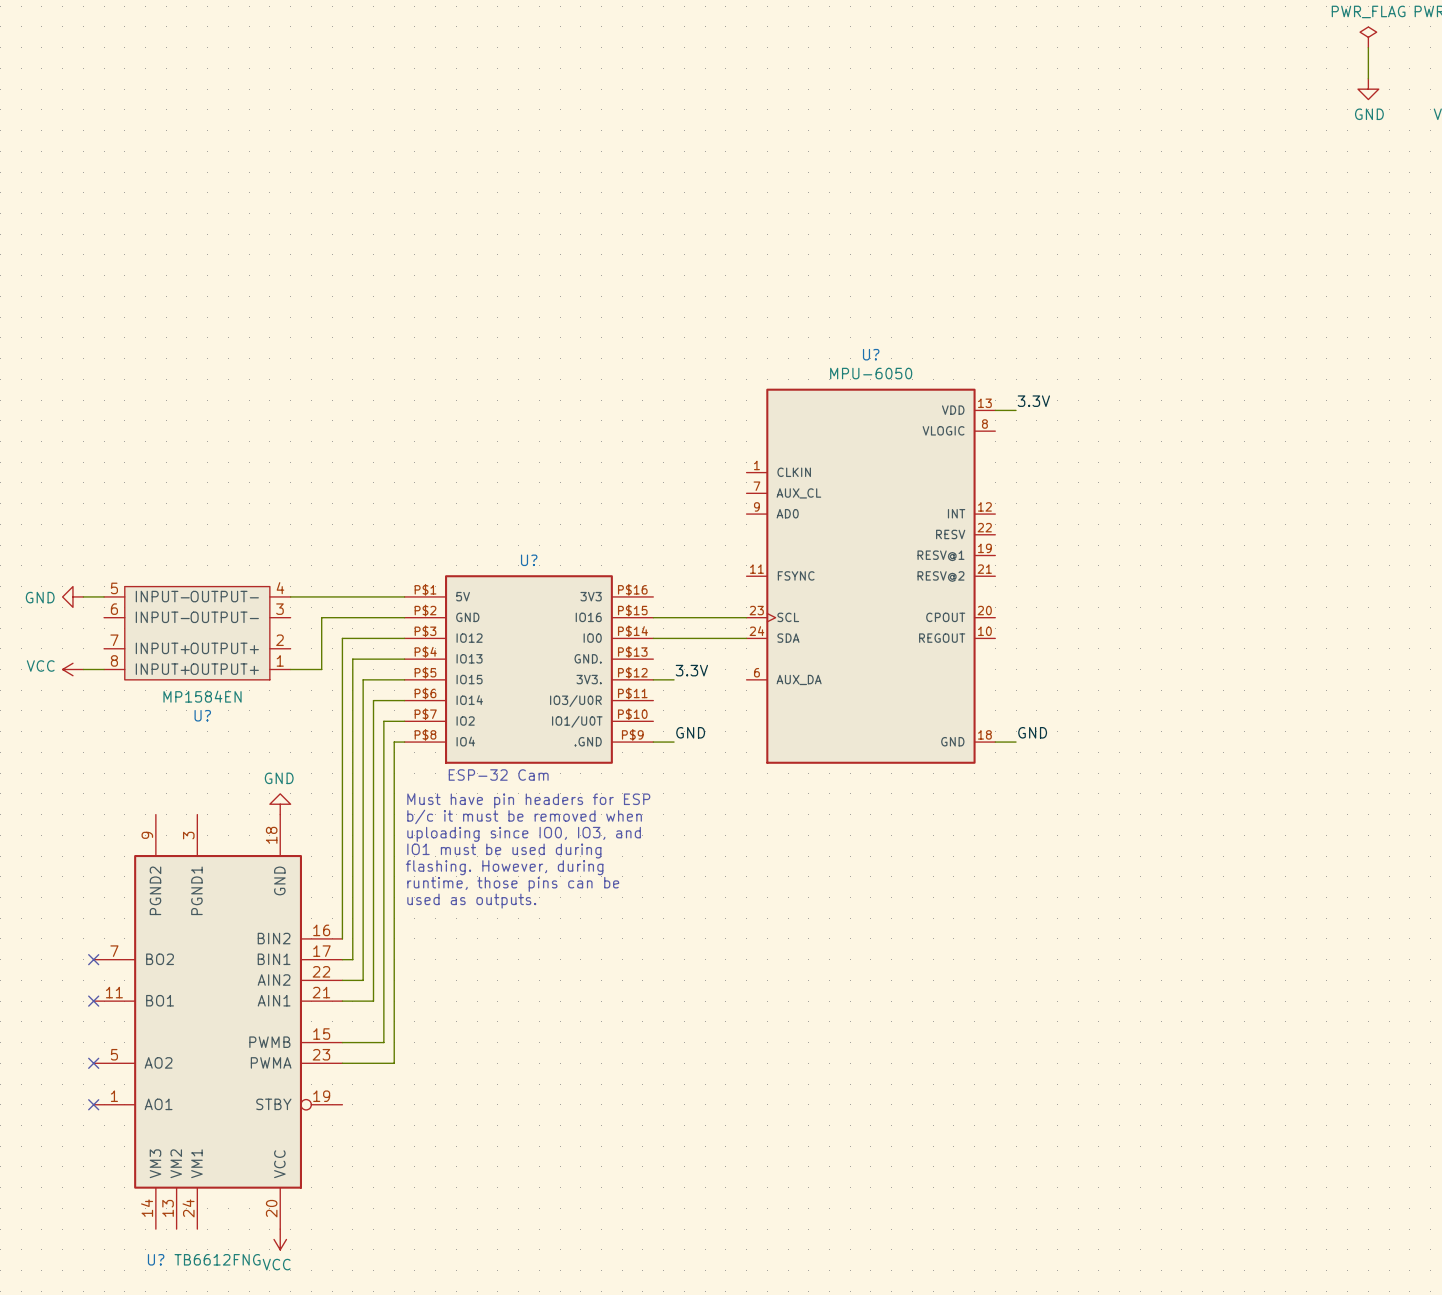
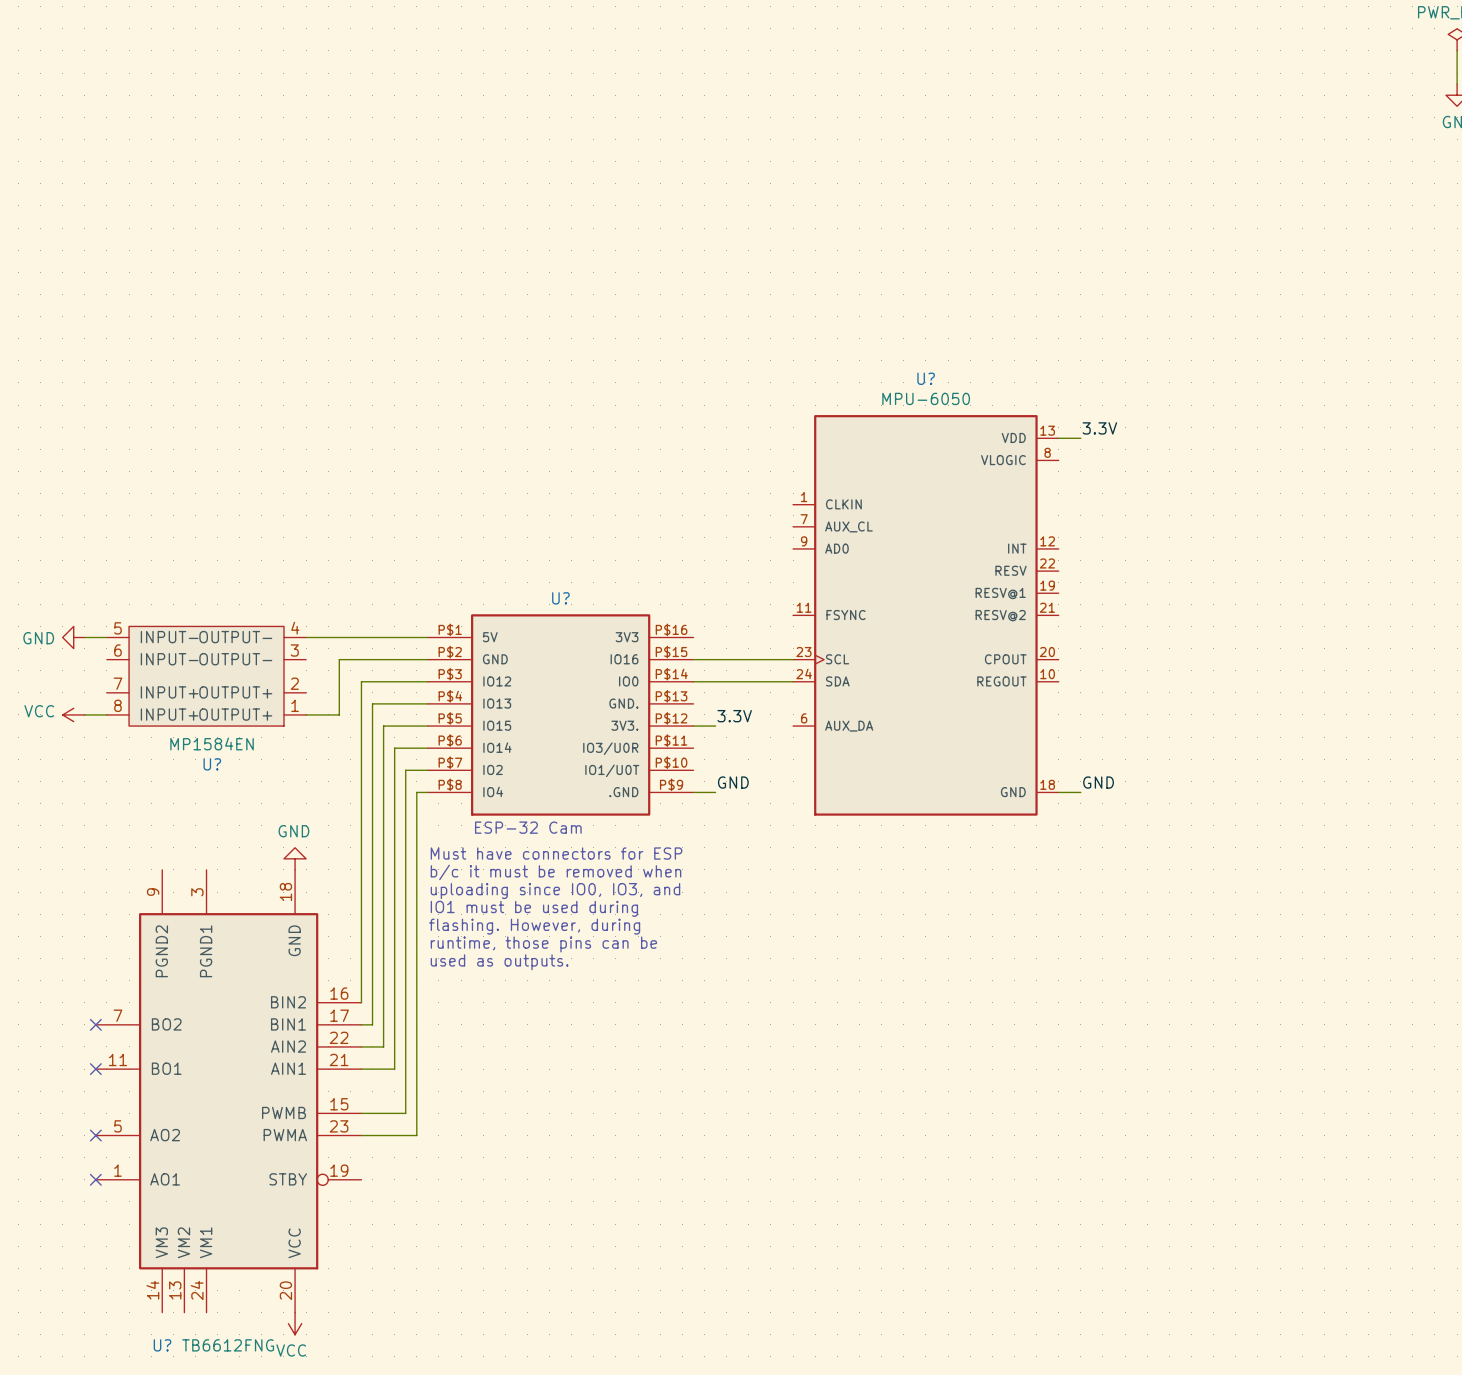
text: Must have pin headers for ESP (528, 800) -> Must have connectors for ESP (556, 853)

